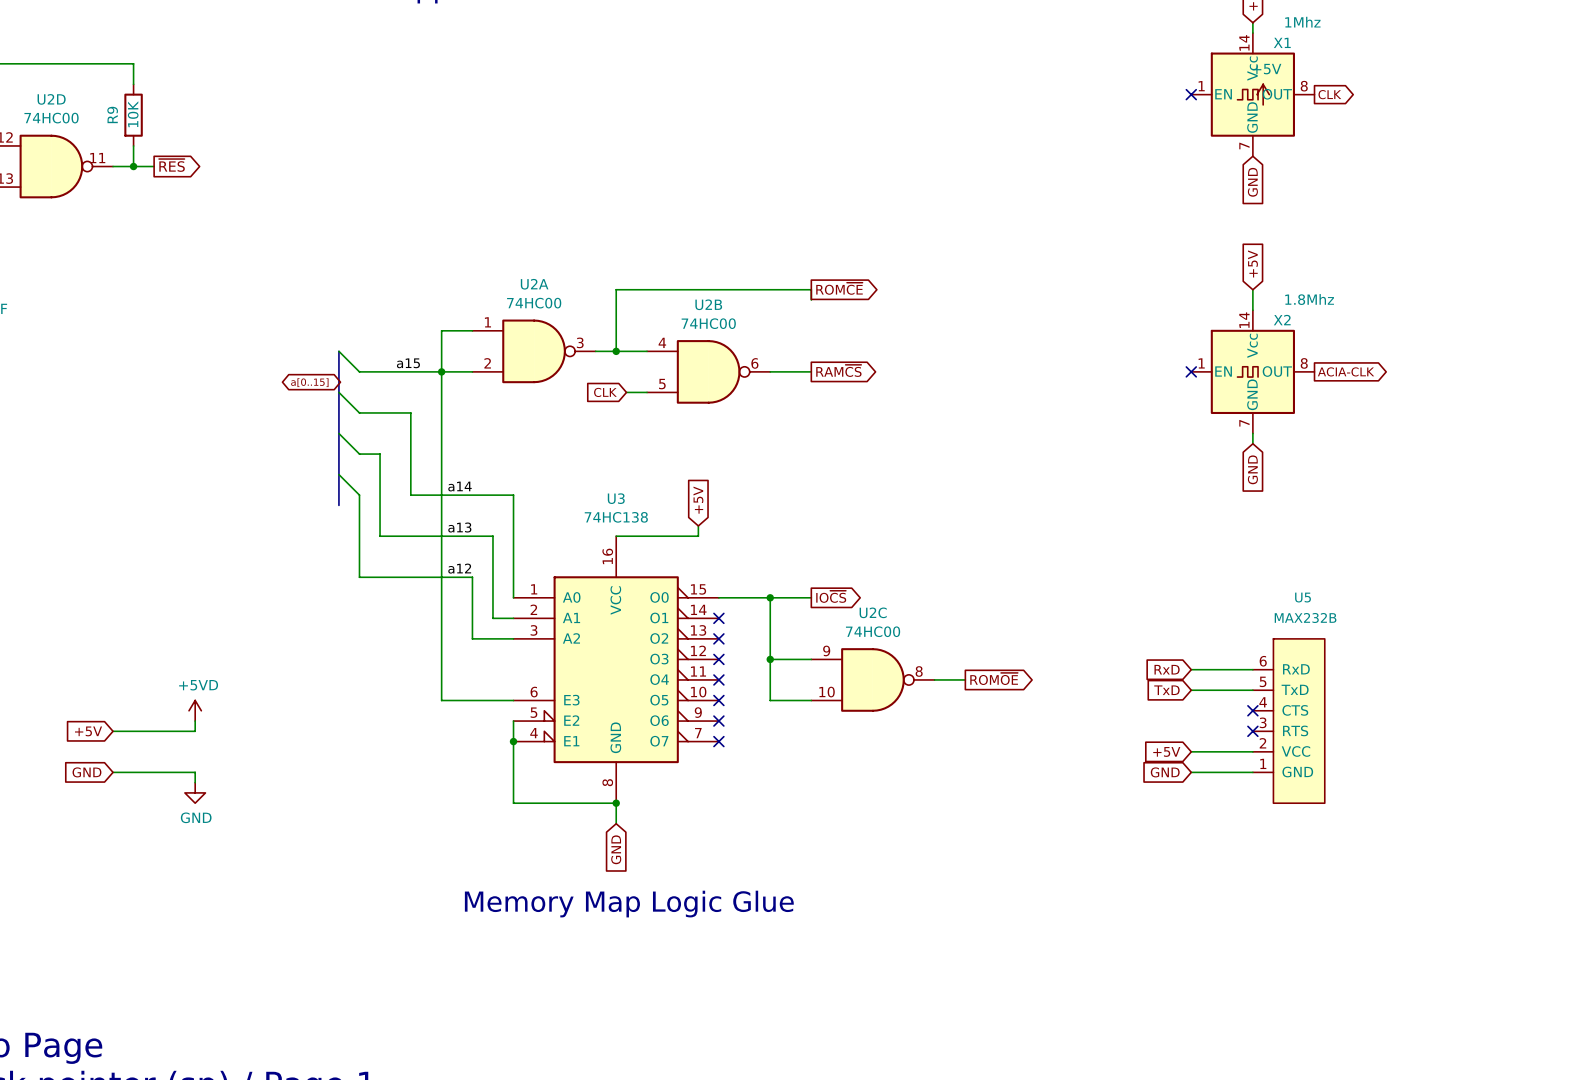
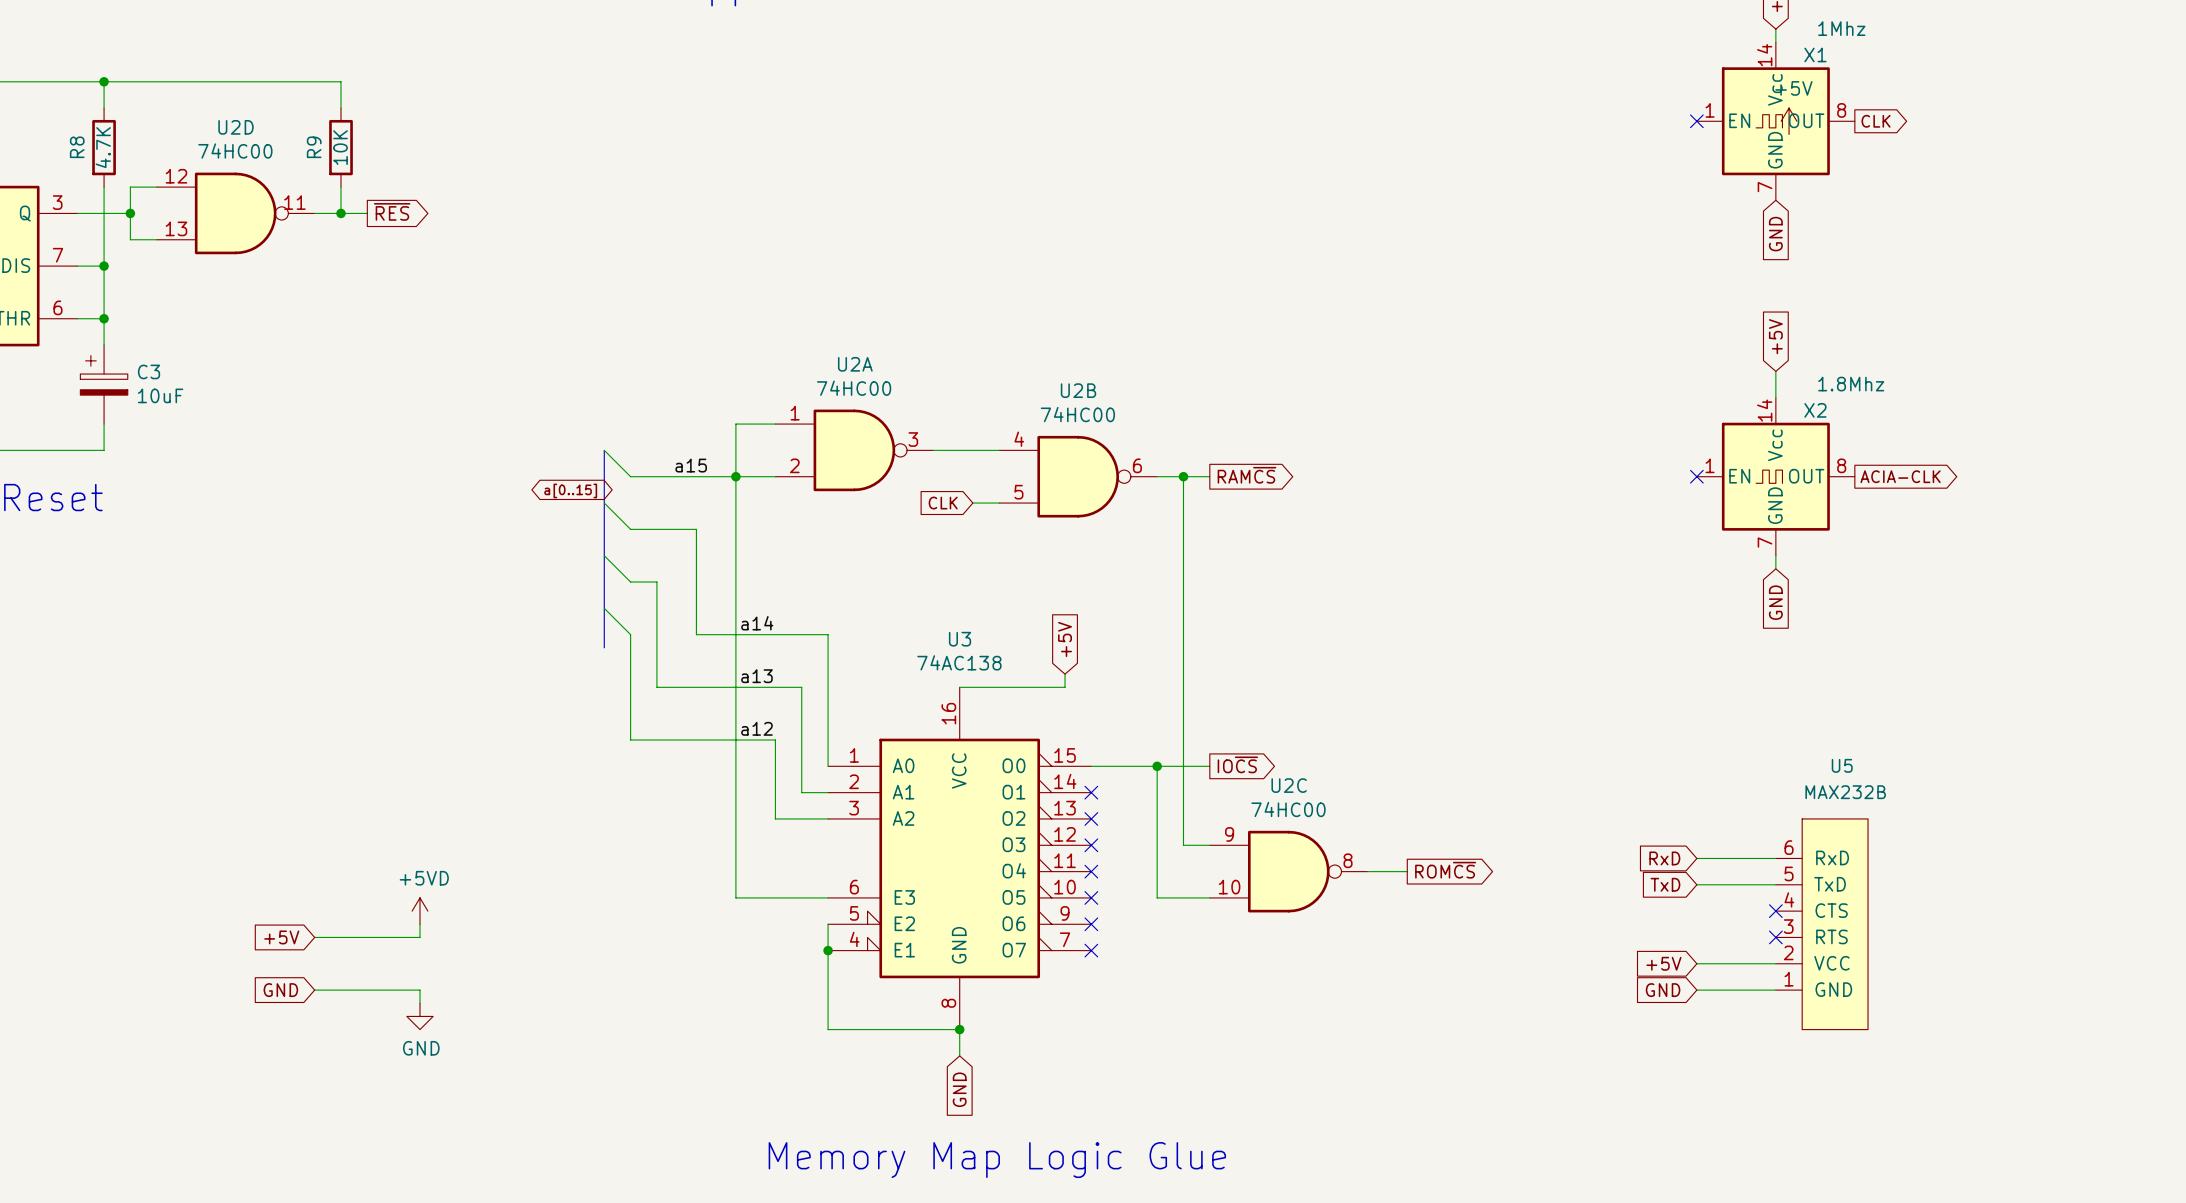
global label: ROM~{CE} (839, 288) -> none
wire: (811, 300) (811, 289) (616, 289) (616, 351) -> none
junction: (616, 351) -> none
junction: none -> (1183, 476)
U3 value: 74HC138 (616, 517) -> 74AC138 (959, 662)
wire: (770, 659) (790, 659) -> (1183, 476) (1183, 845)
junction: (770, 659) -> none
global label: ROM~{OE} (994, 678) -> ROM~{CS} (1445, 870)

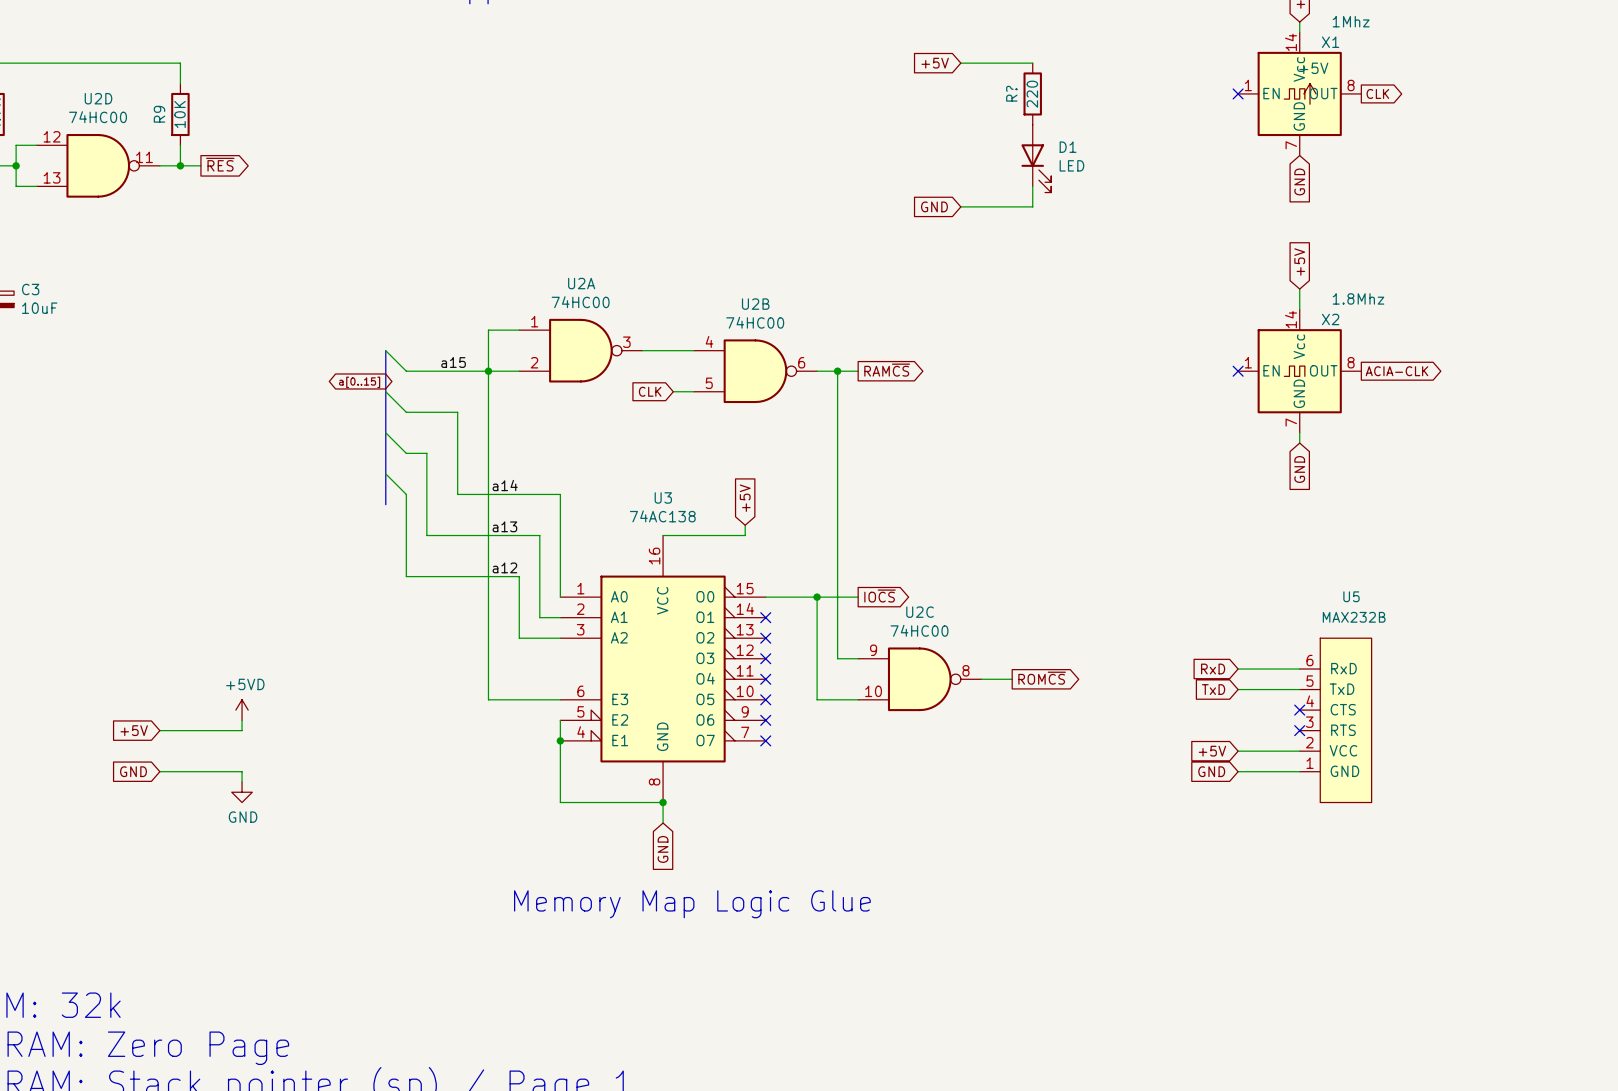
global label: none -> +5V (935, 63)
wire: none -> (960, 63) (1032, 63)
R?: none -> 220 (1032, 93)
D1: none -> LED (1036, 158)
wire: none -> (1032, 186) (1032, 206) (960, 206)
global label: none -> GND (934, 206)

